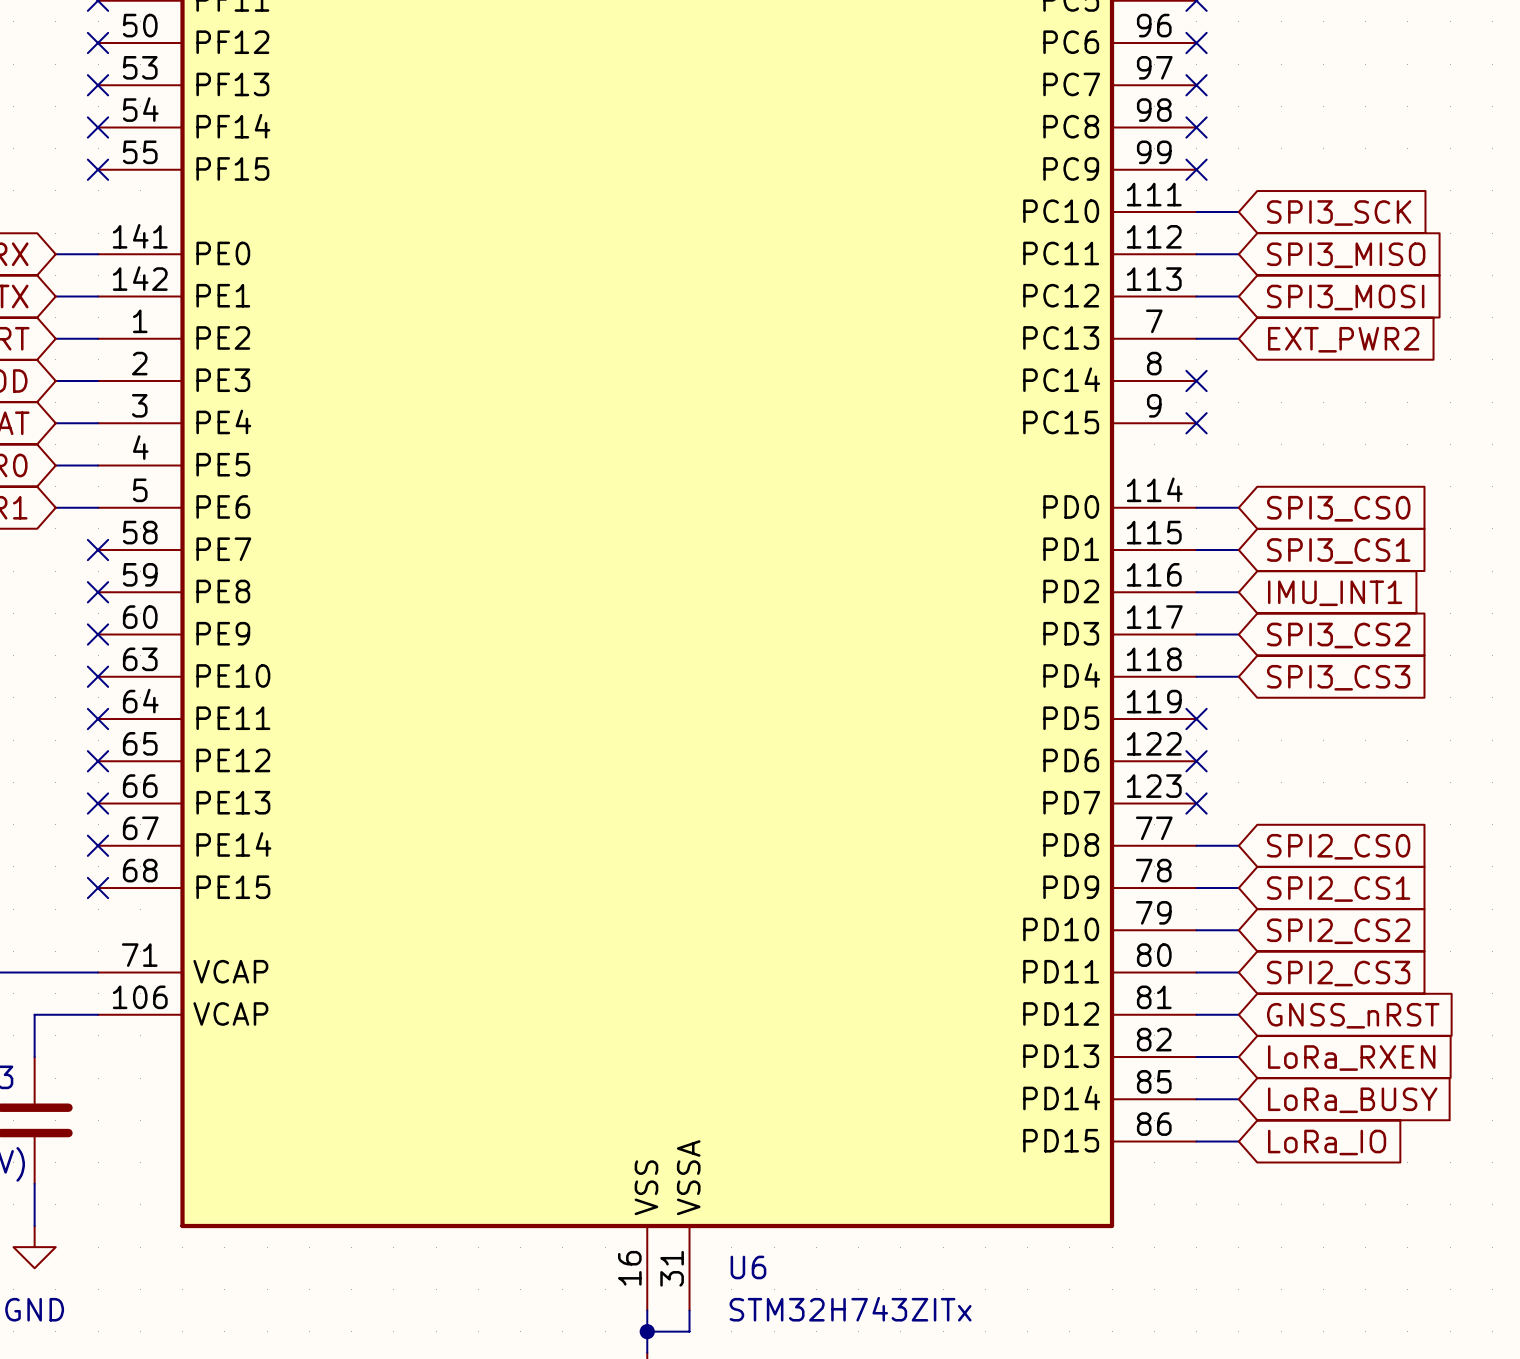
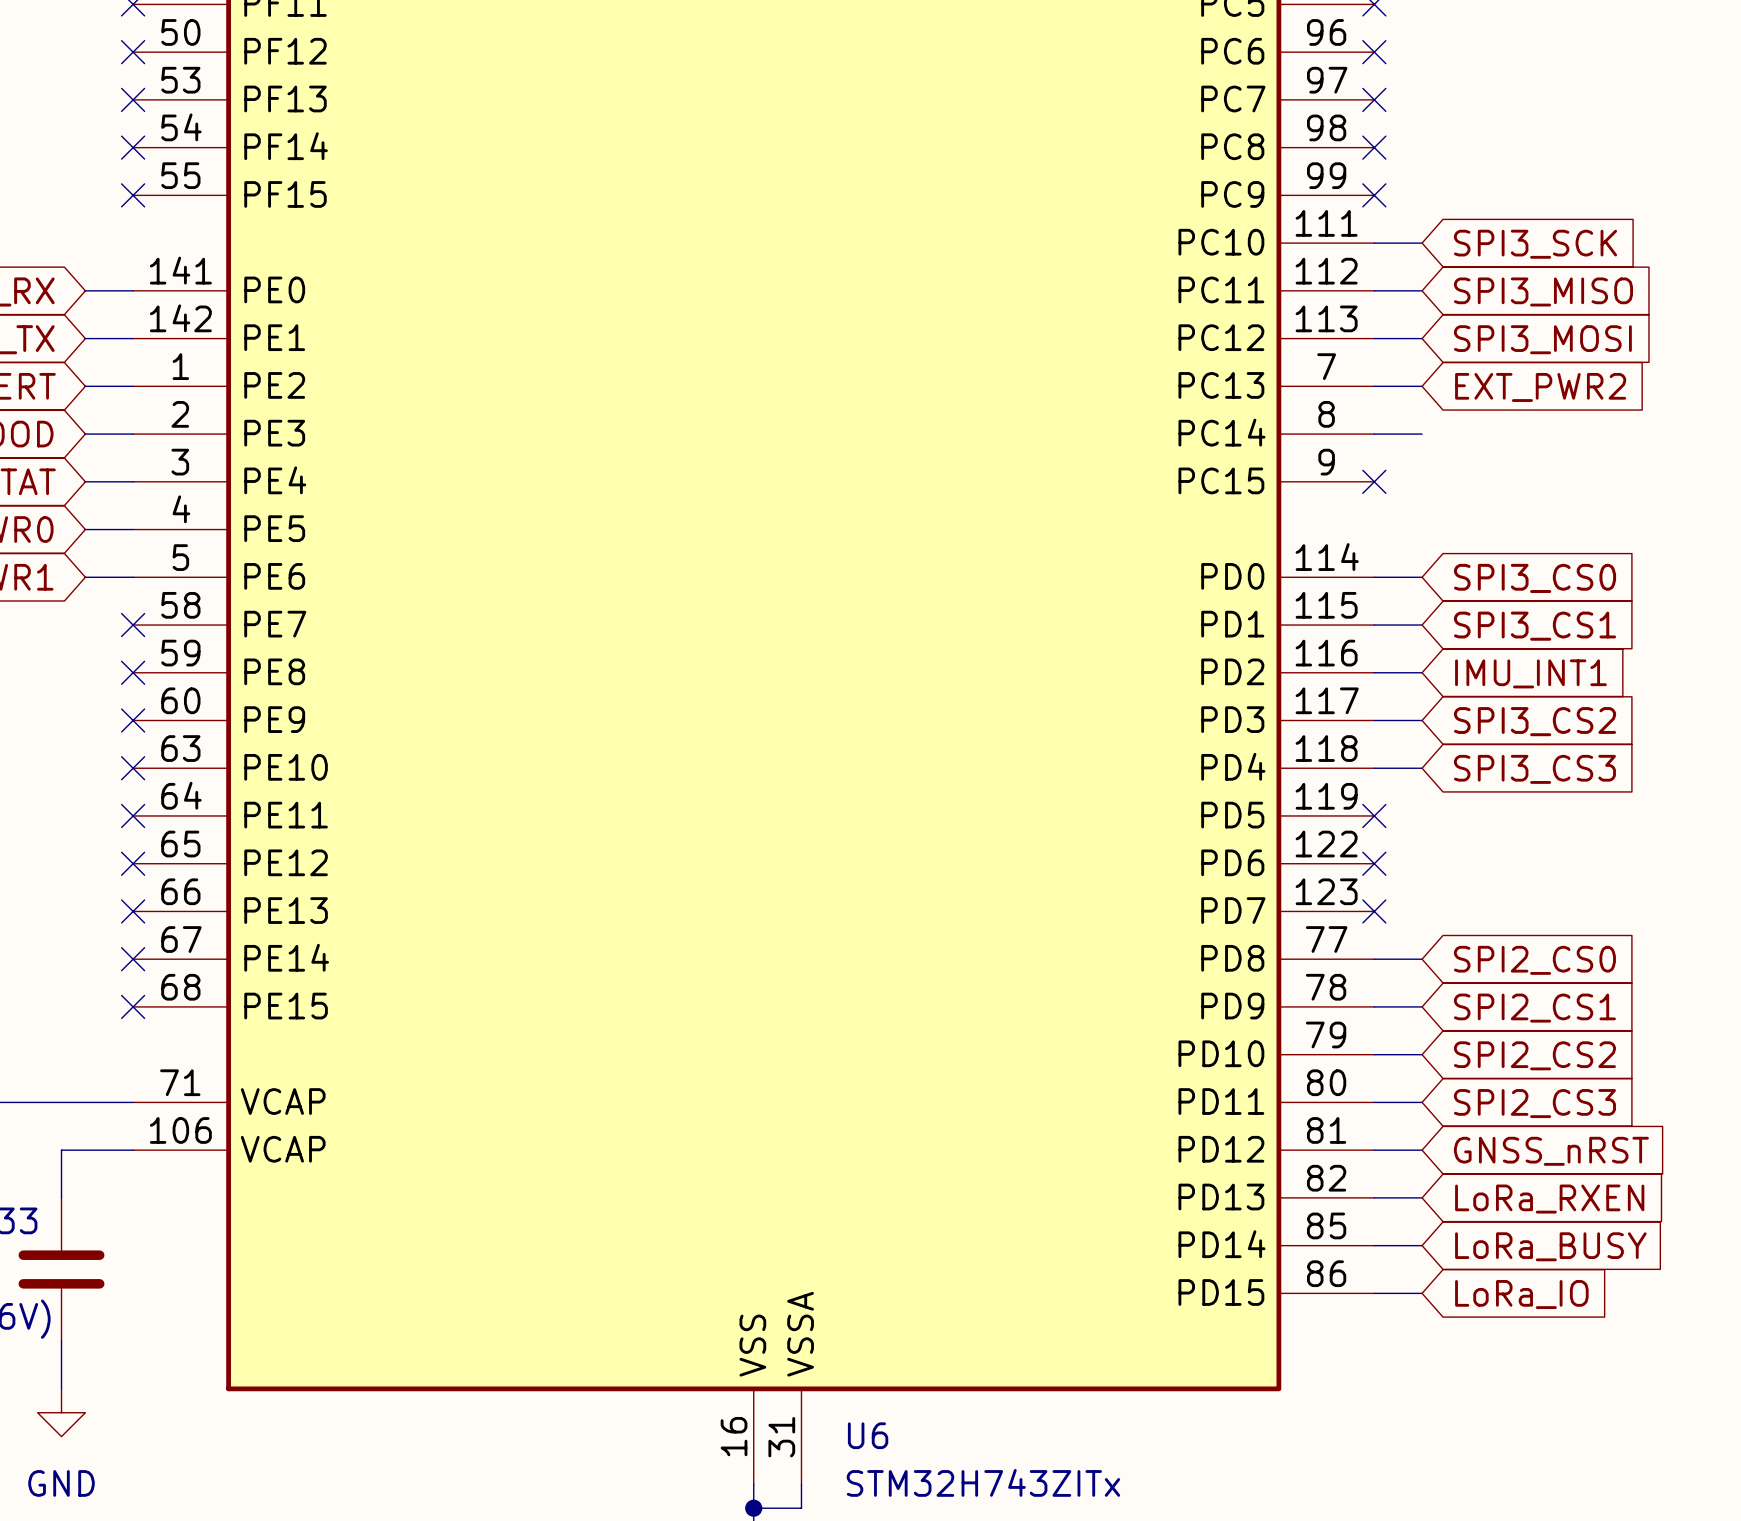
wire: none -> (1374, 434) (1422, 434)
no-connect mark: (1196, 381) -> none

